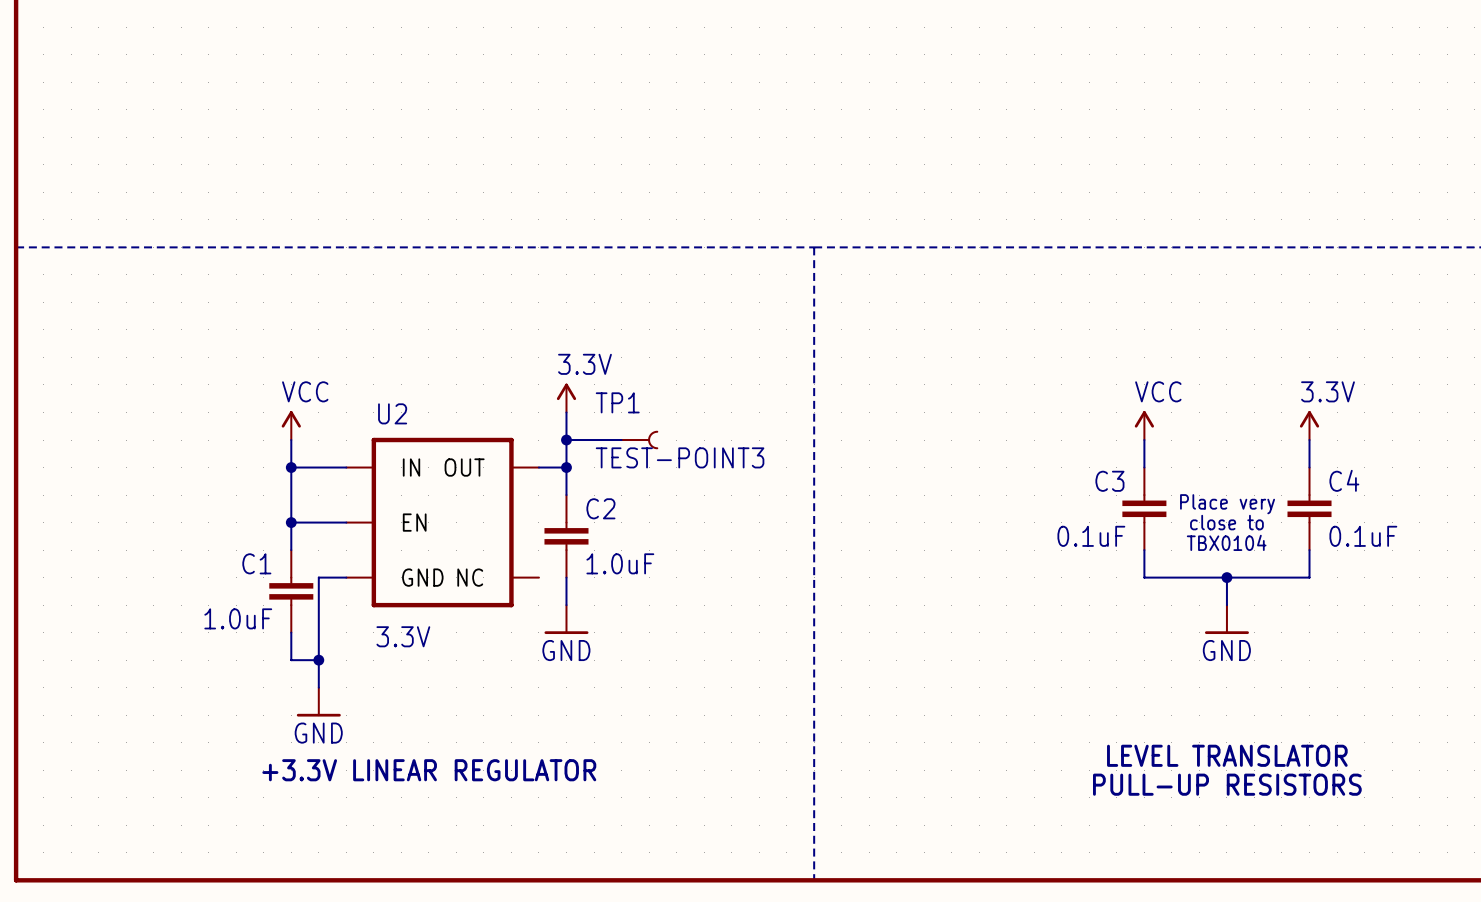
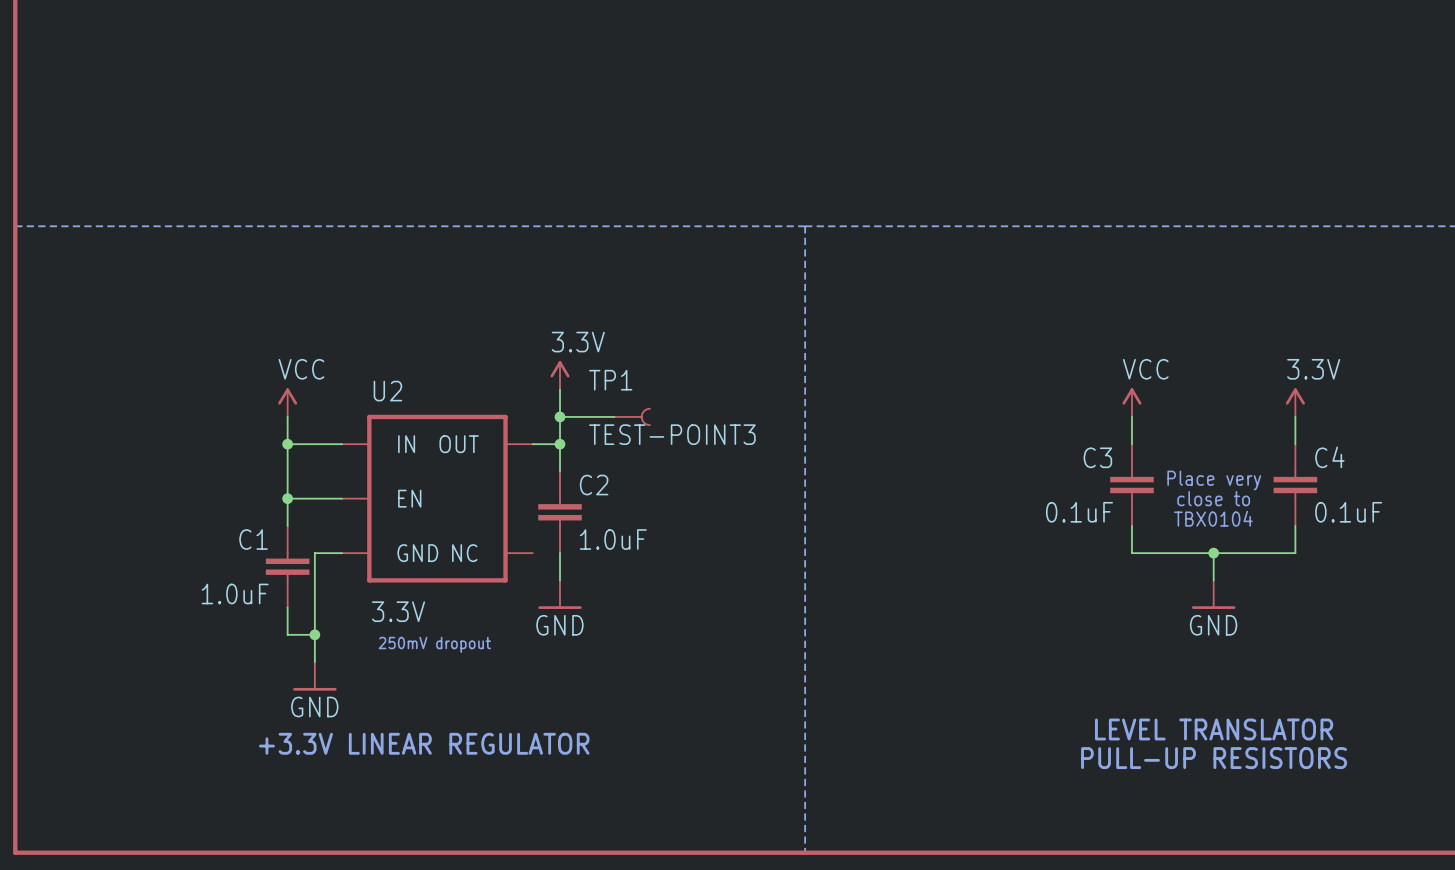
text: none -> 250mV dropout (434, 644)

